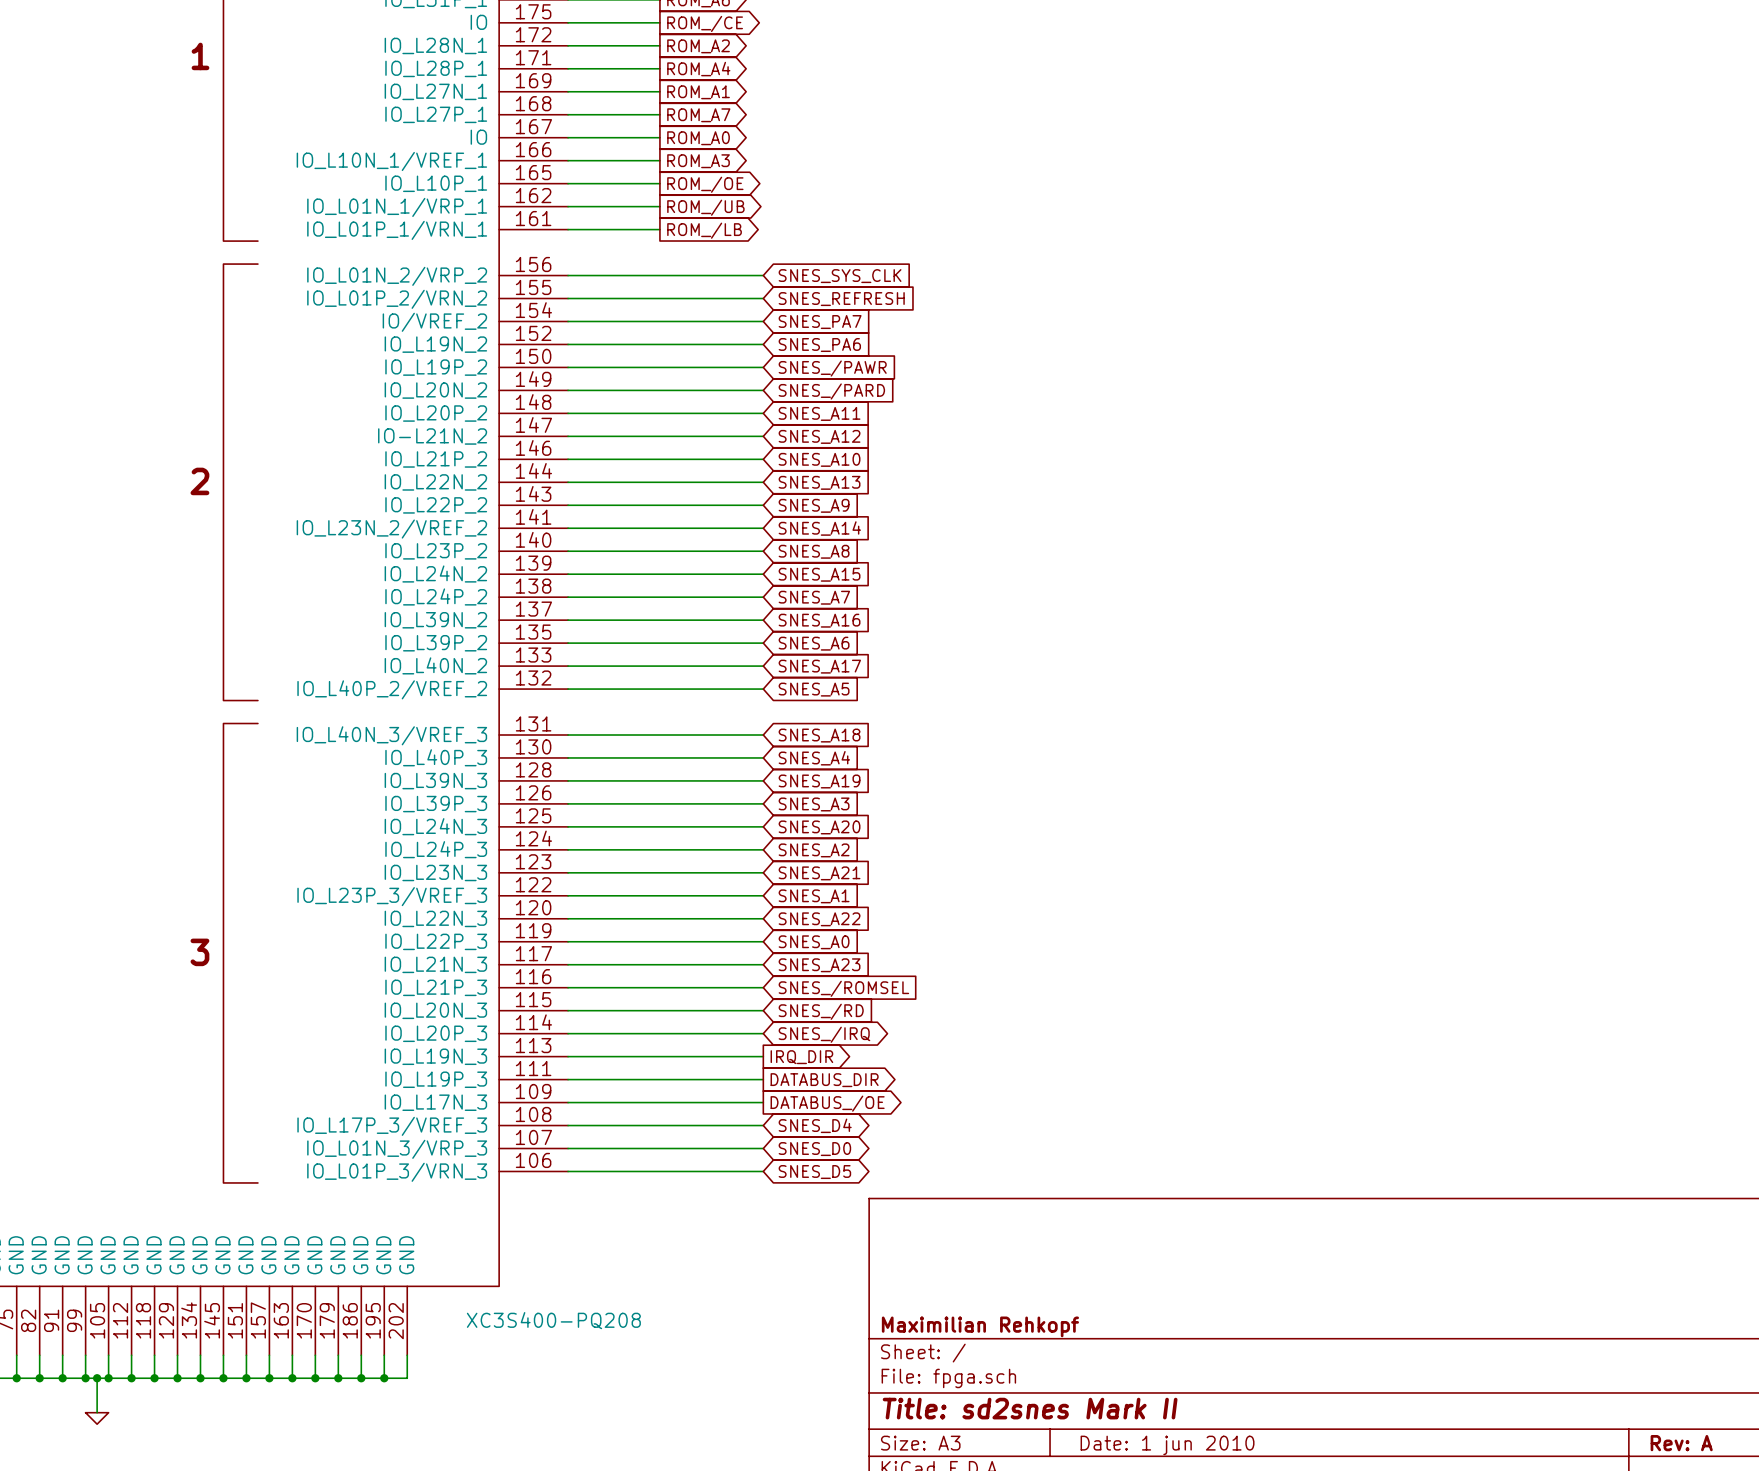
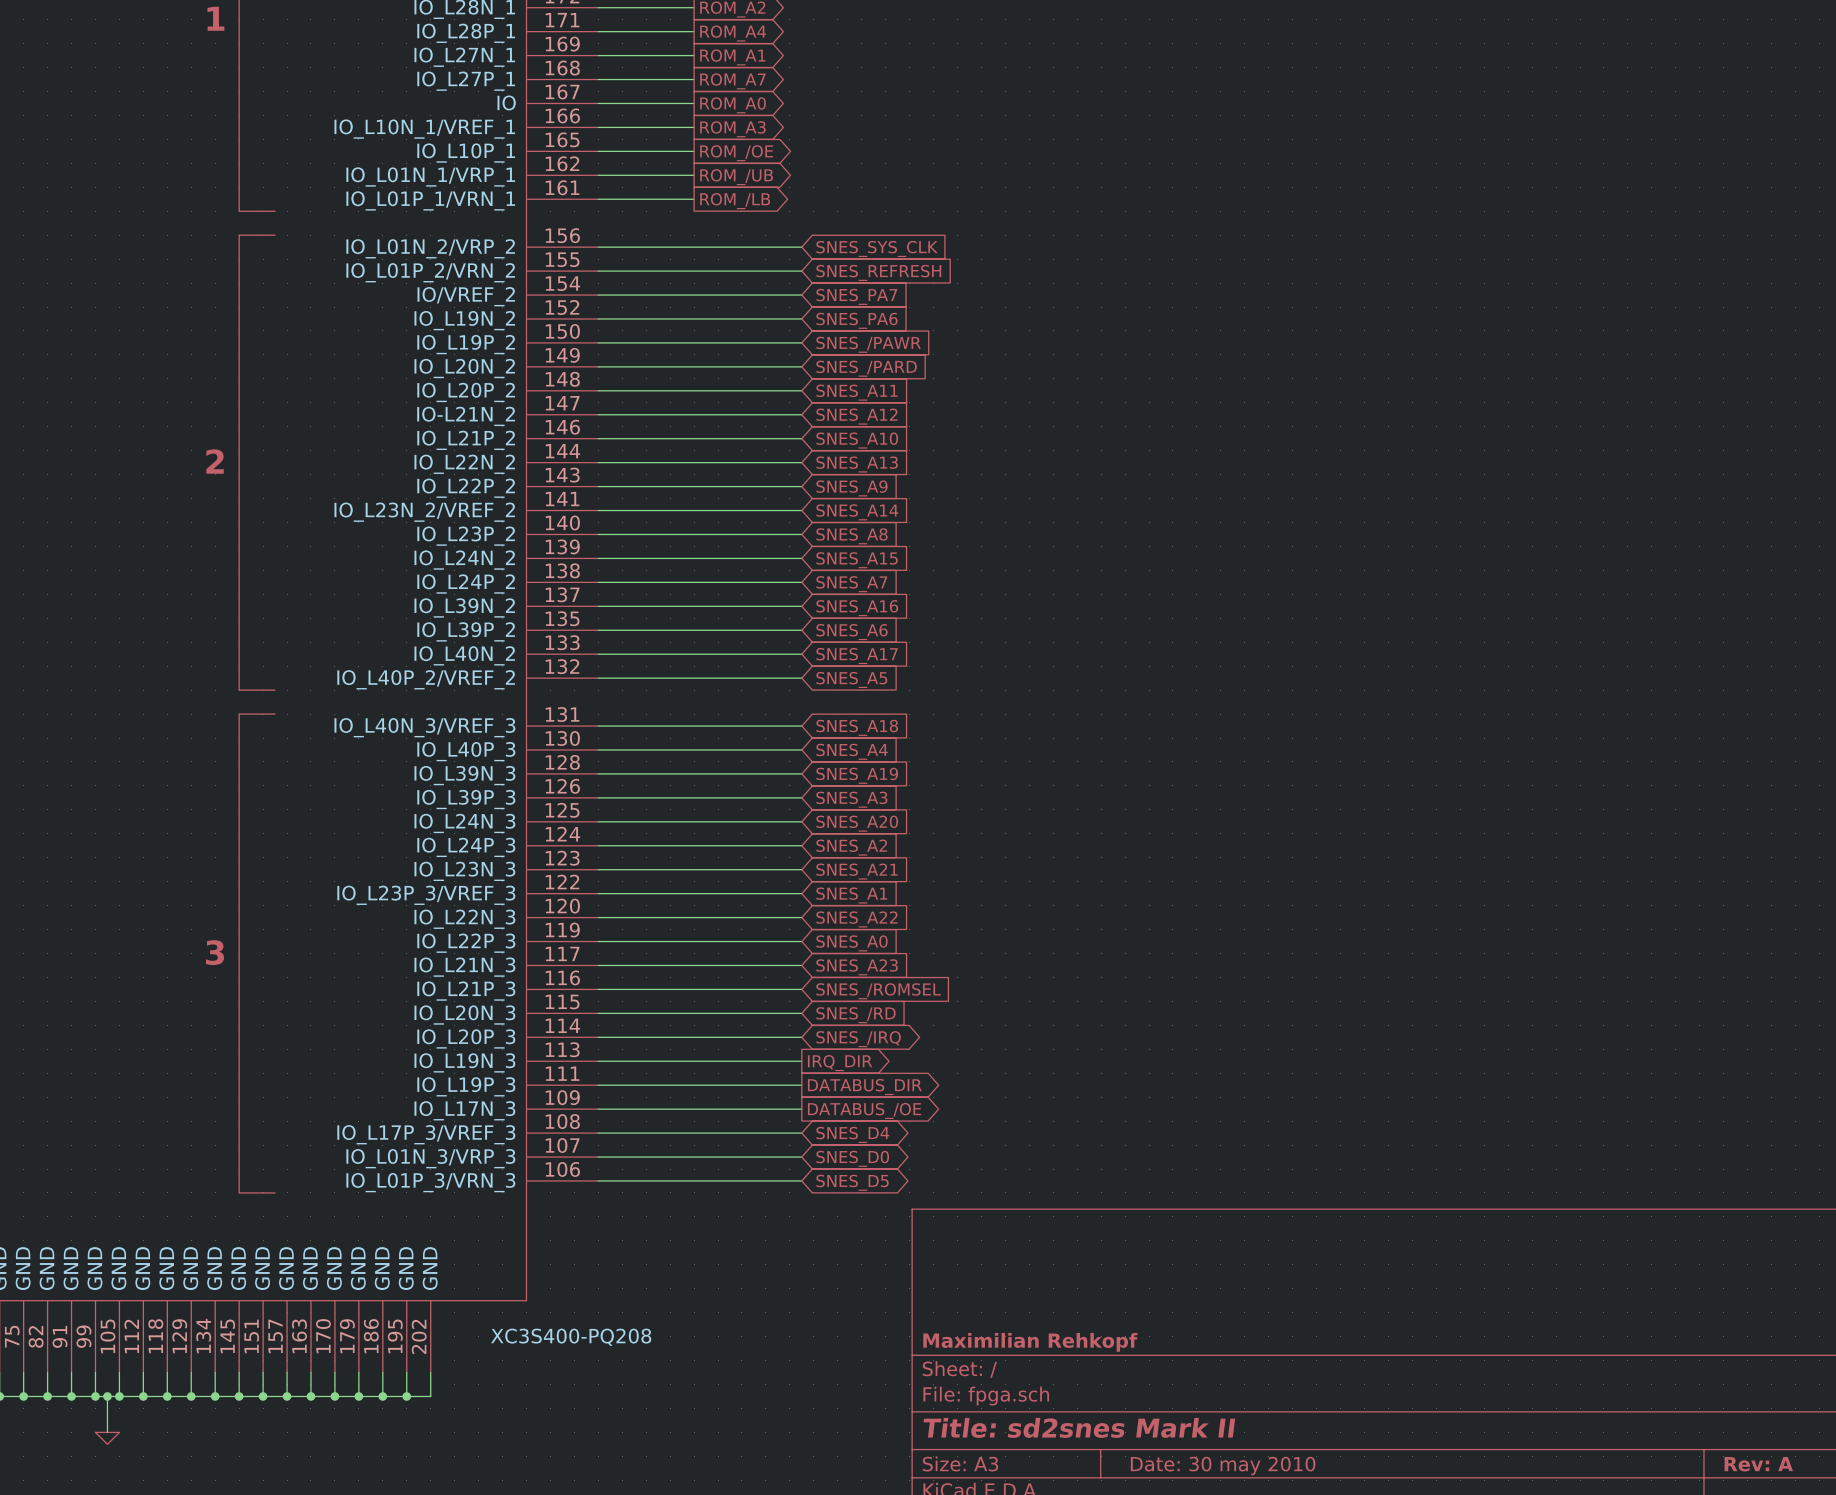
title block: Date: 1 jun 2010 (1167, 1445) -> Date: 30 may 2010 (1223, 1465)

